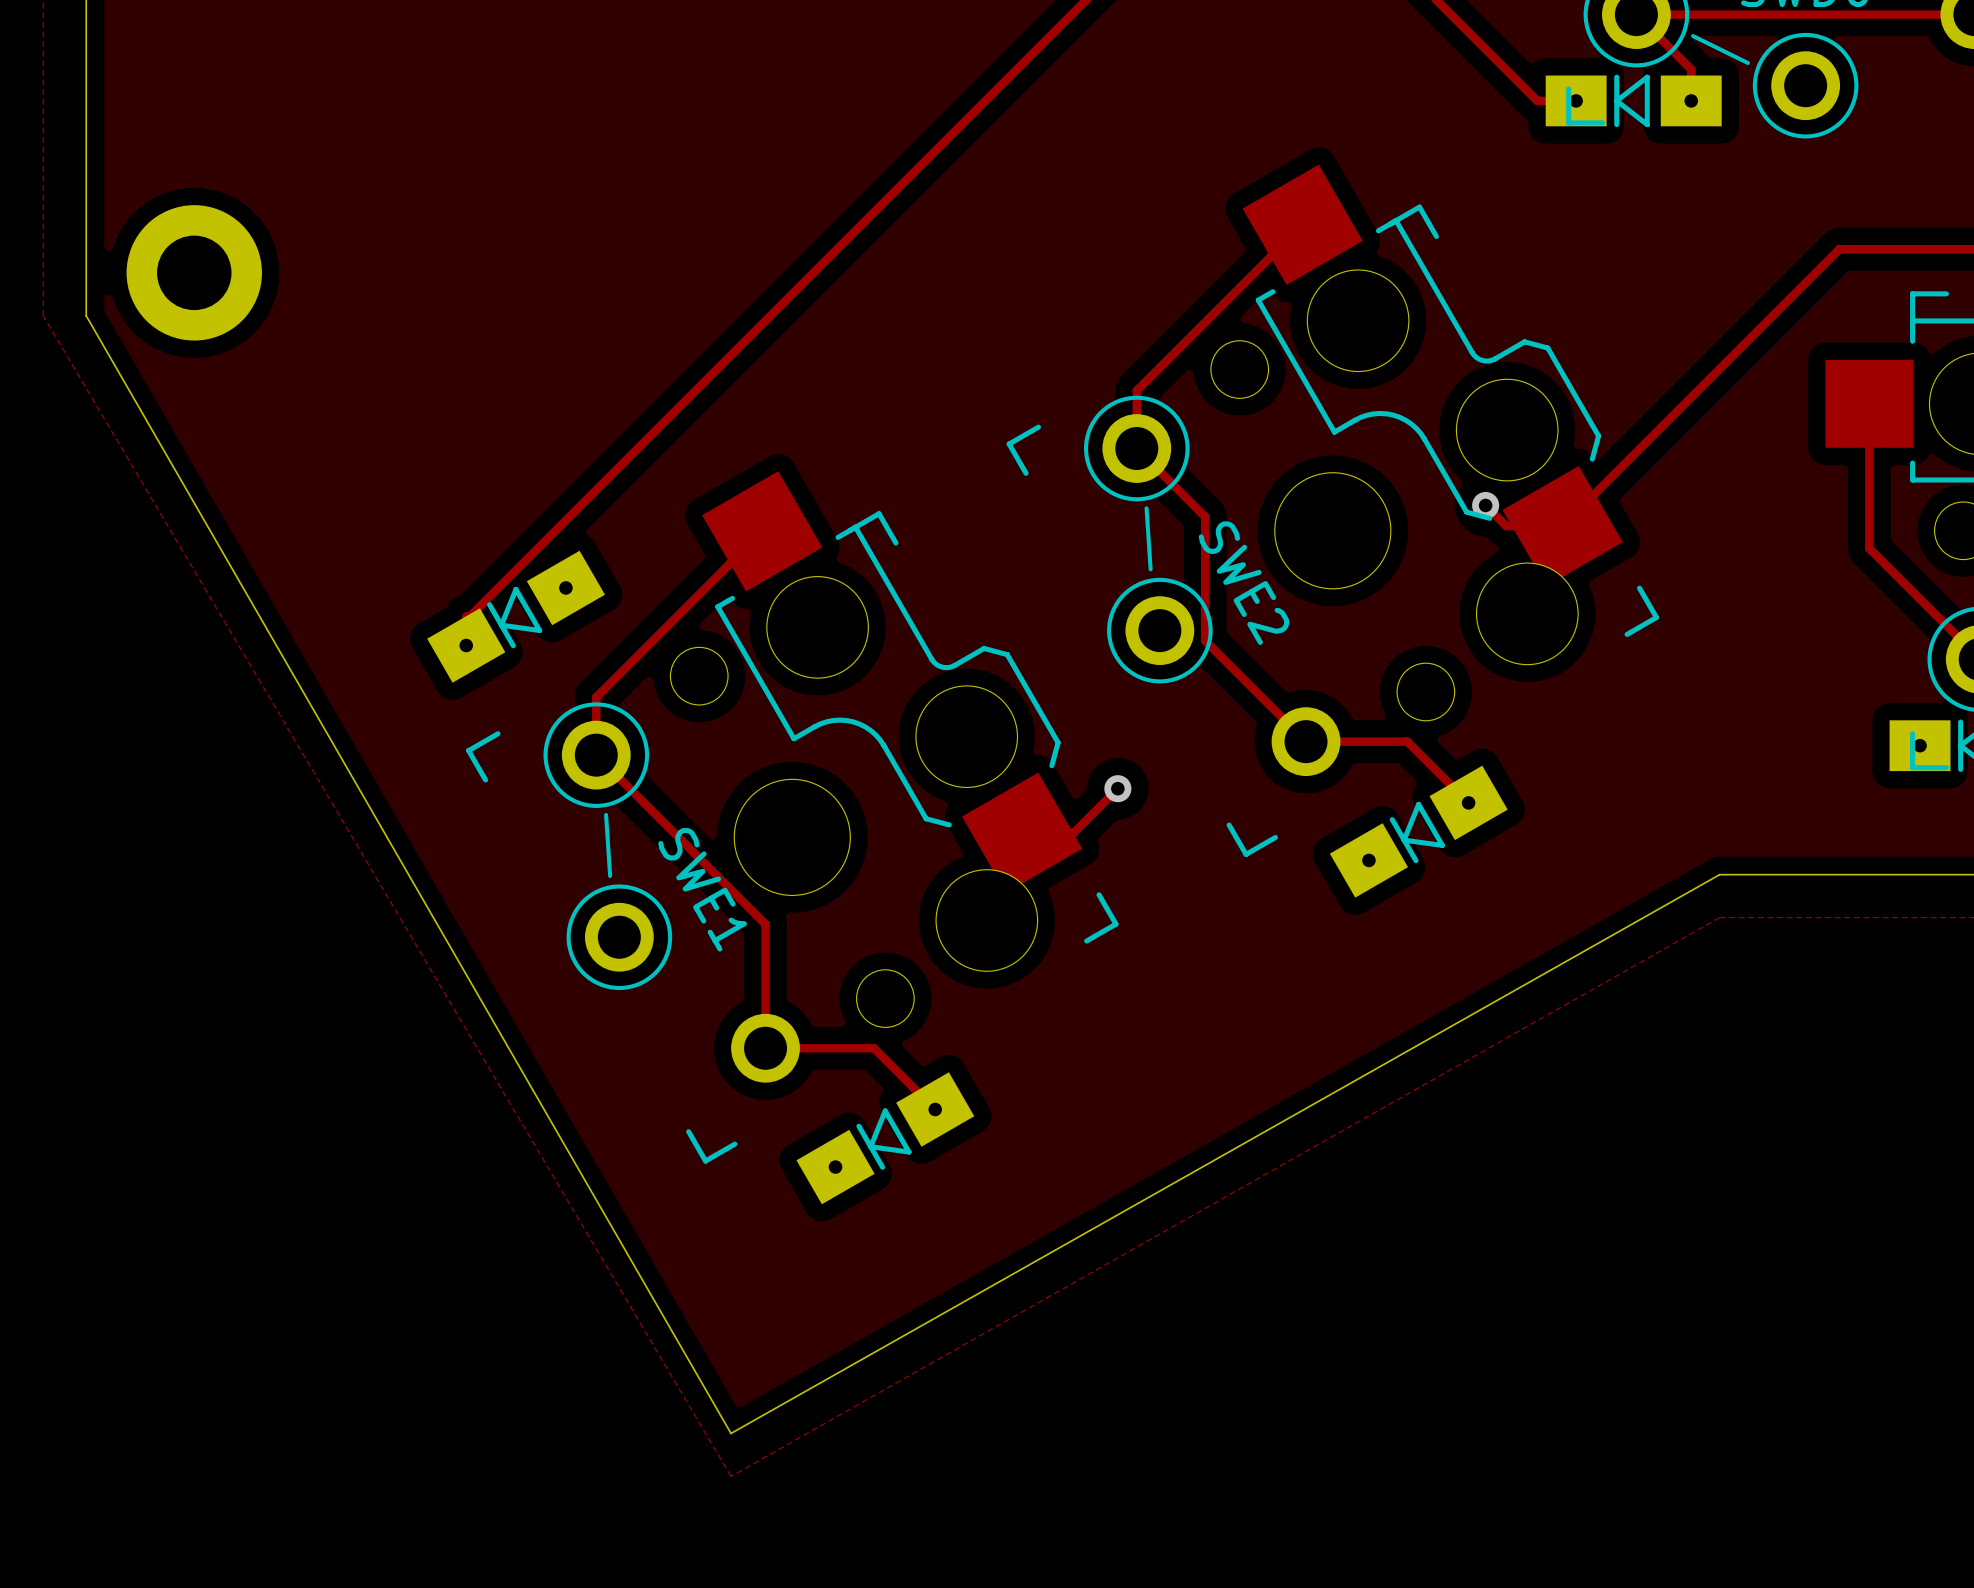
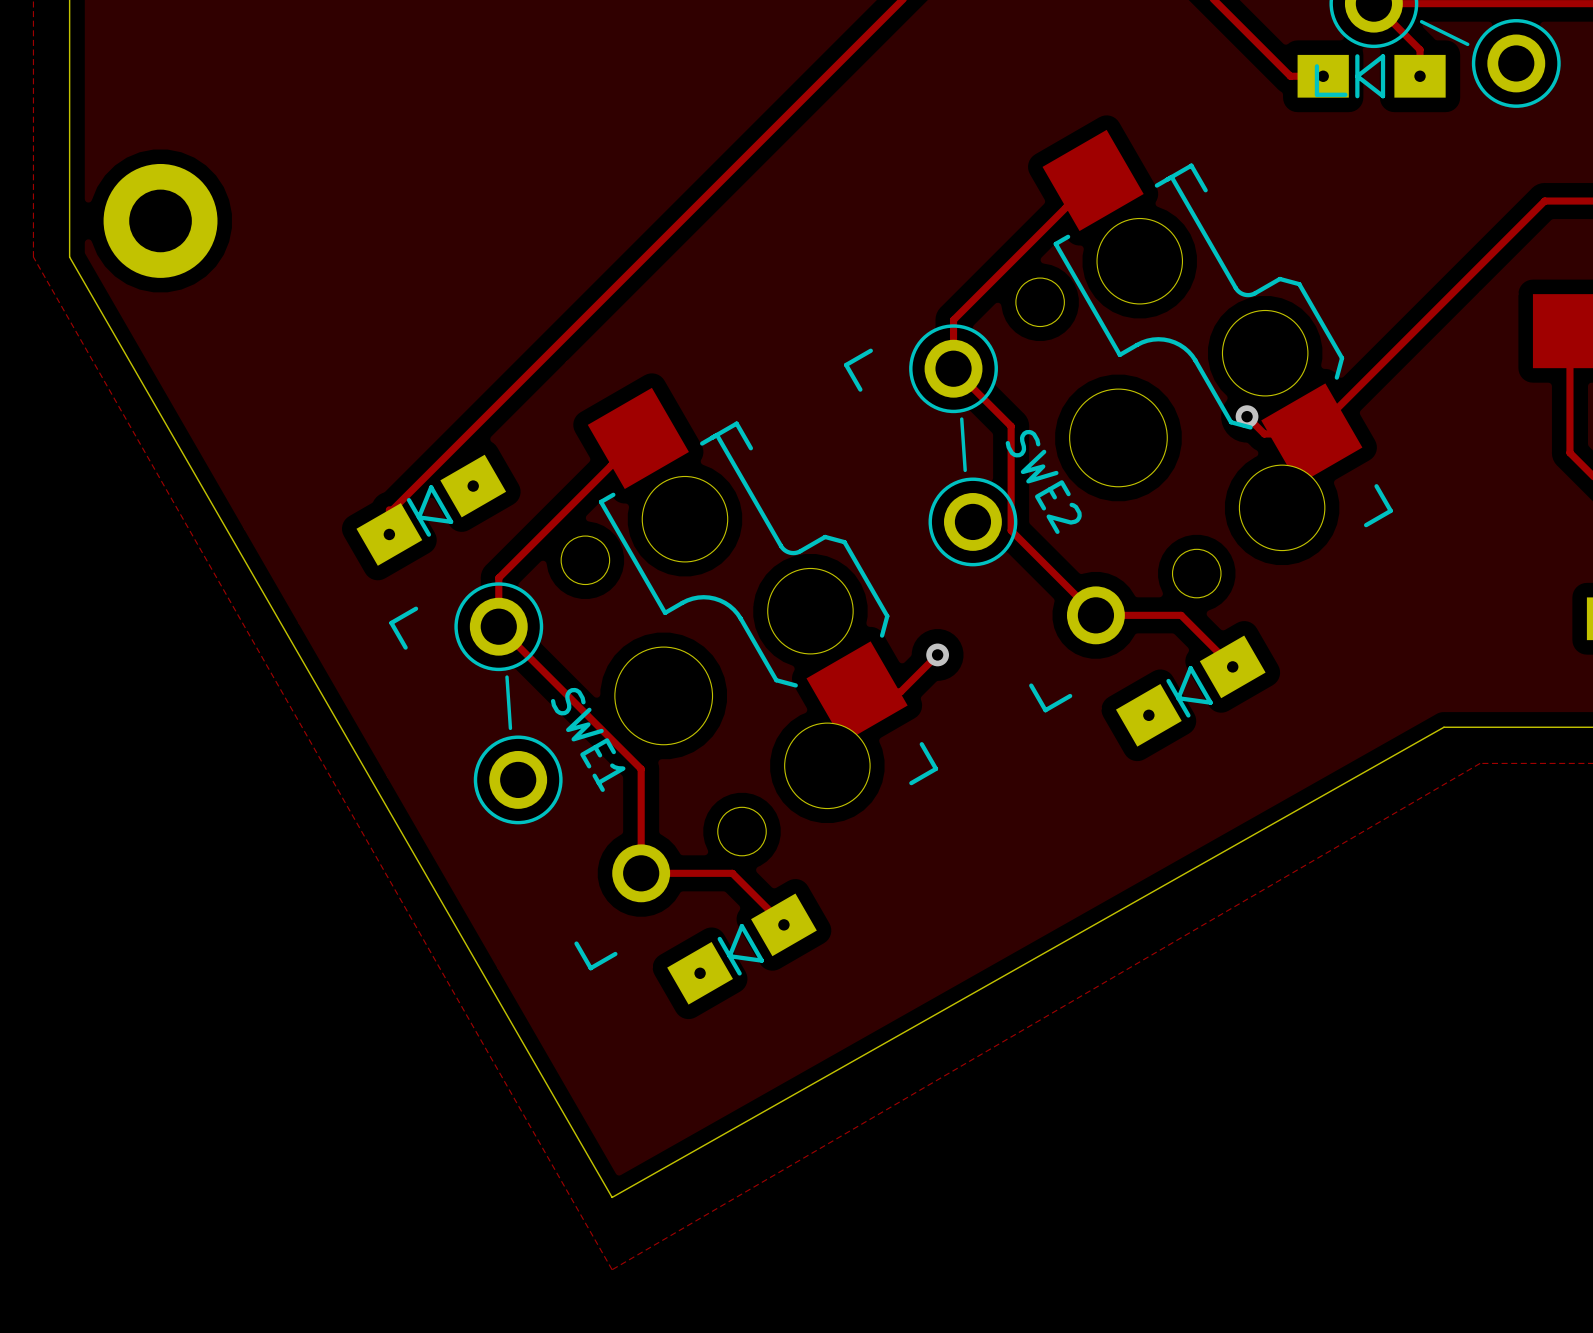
zone outline: (43, 315) (731, 1476) (1719, 917) (1762, 917) -> (33, 257) (612, 1269) (1480, 763)

